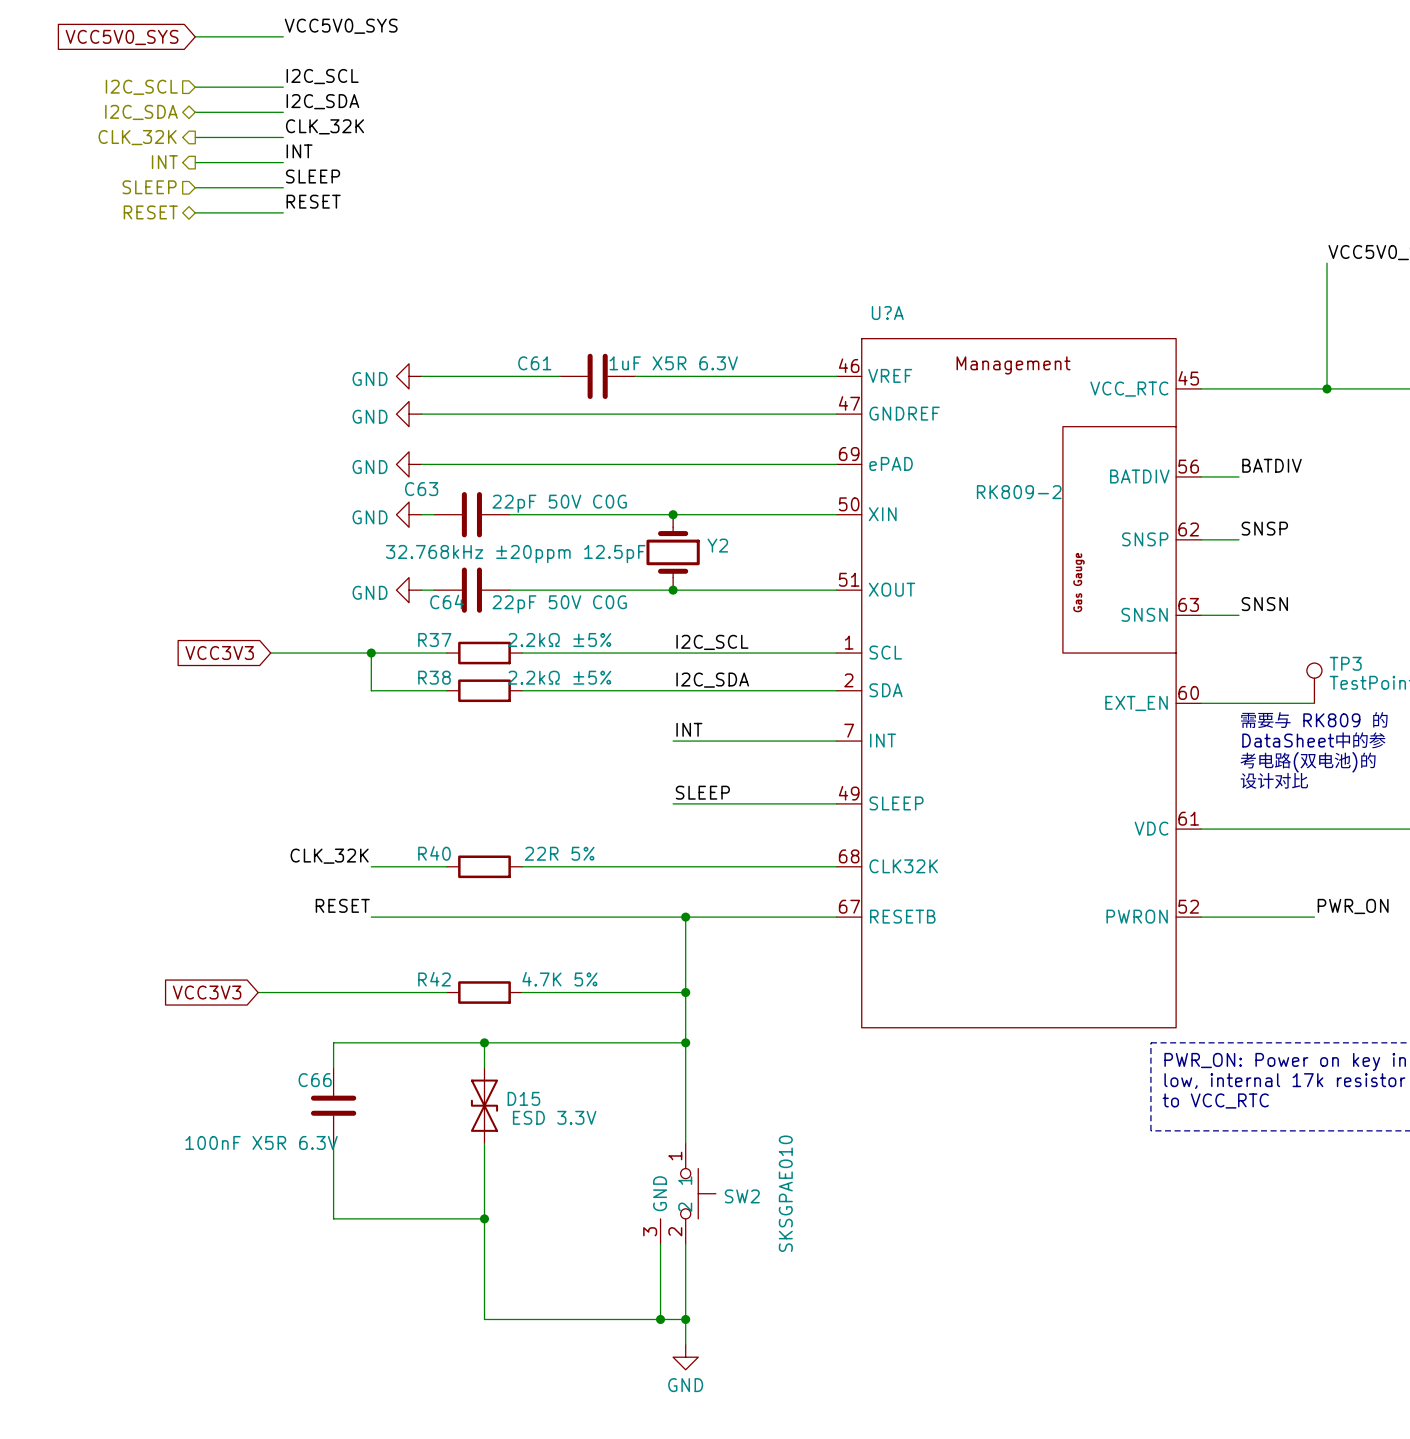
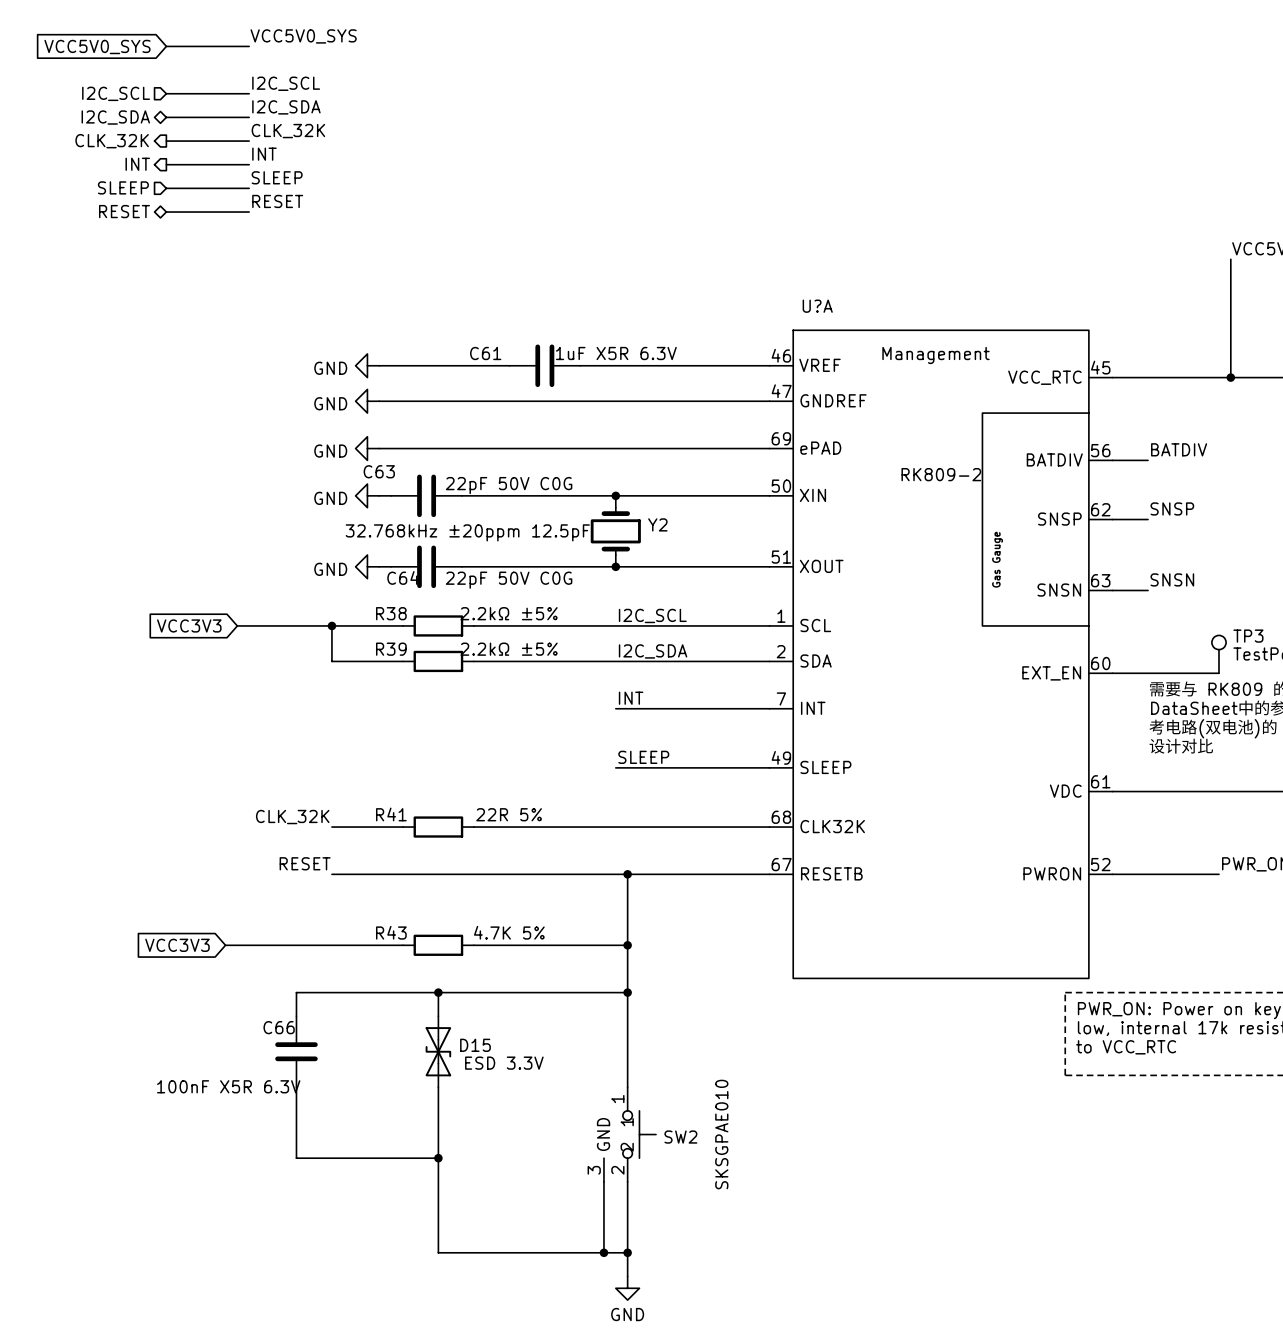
R37 name: R37 (434, 639) -> R38 (391, 613)
R38 name: R38 (434, 677) -> R39 (391, 649)
R40 name: R40 (434, 853) -> R41 (391, 814)
R42 name: R42 (434, 979) -> R43 (391, 932)

